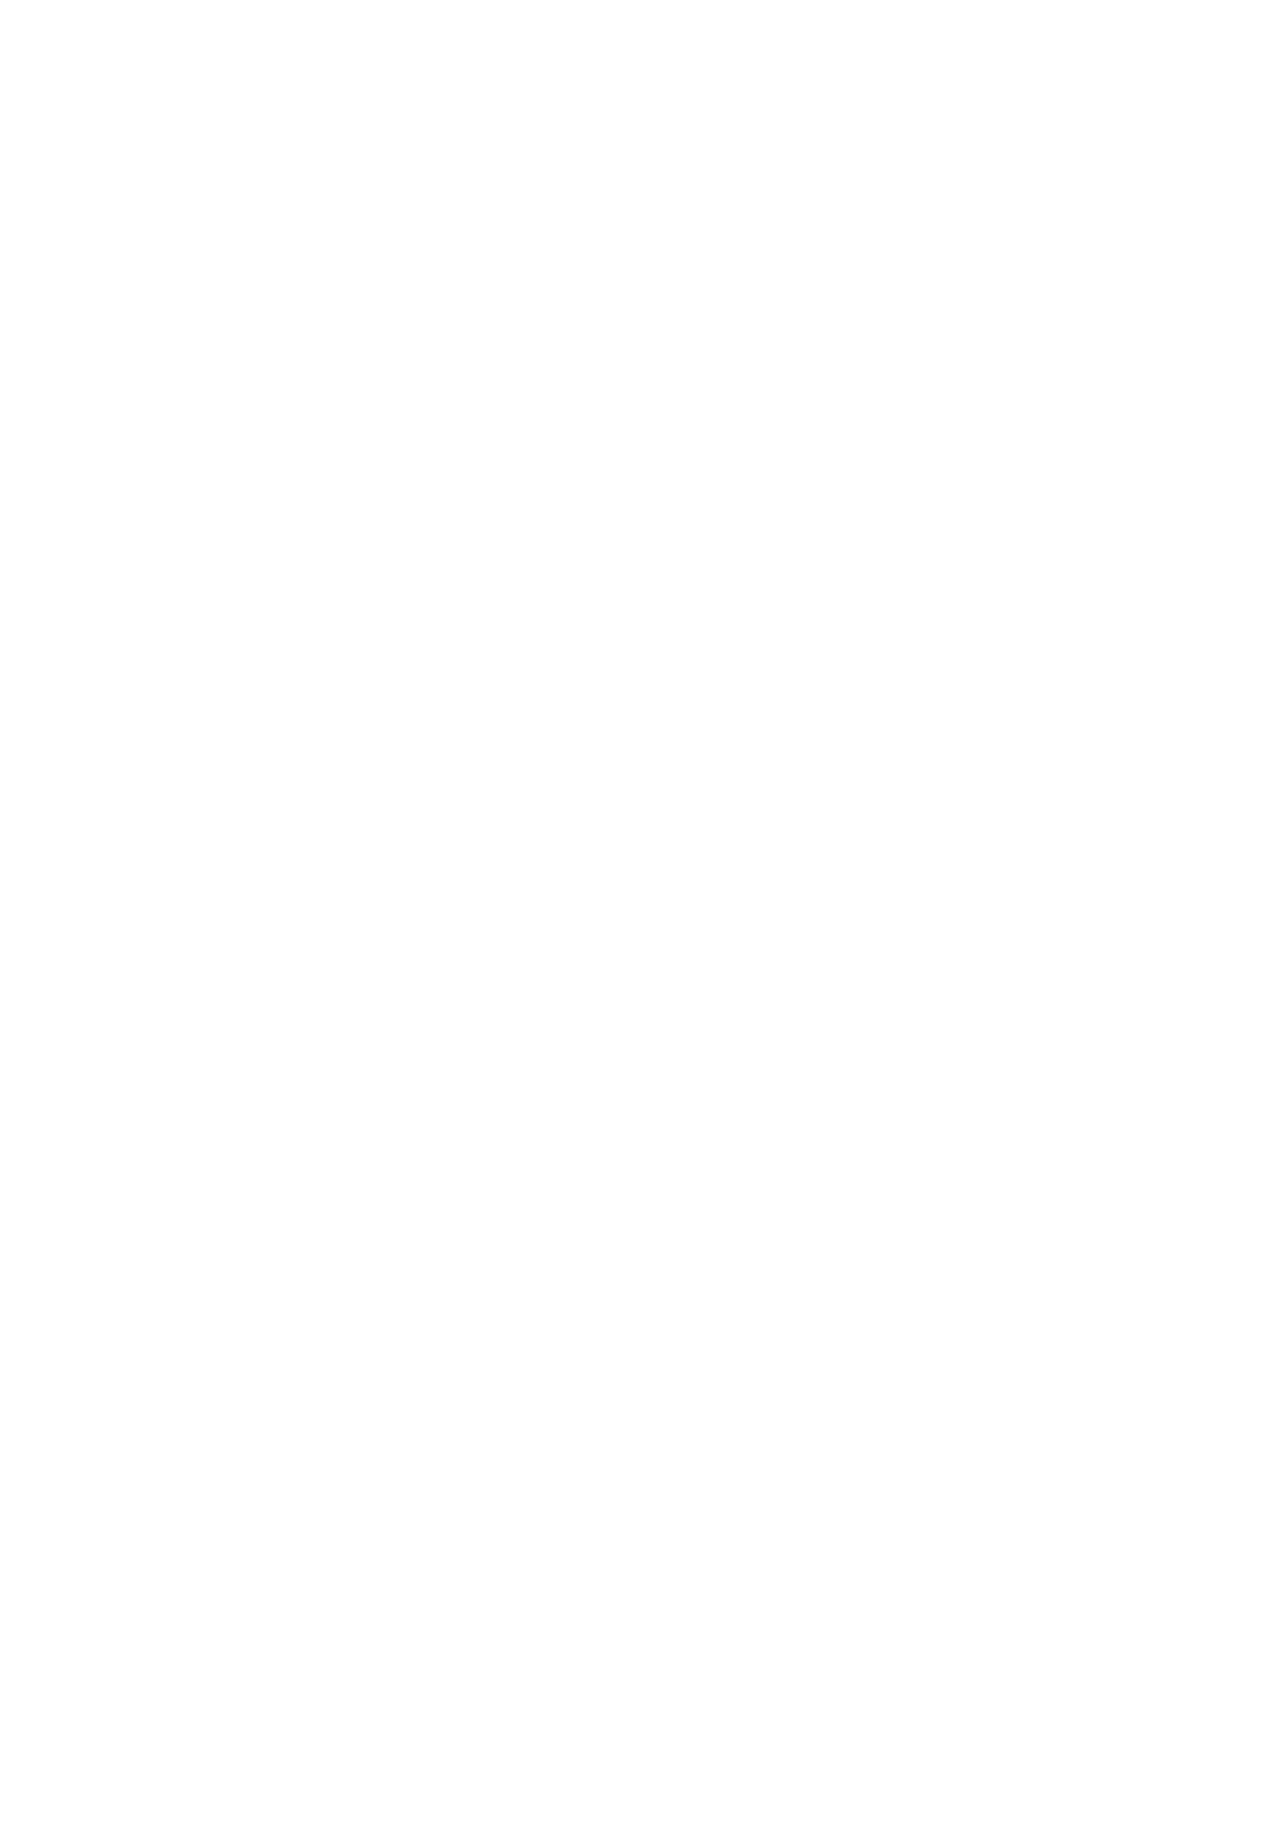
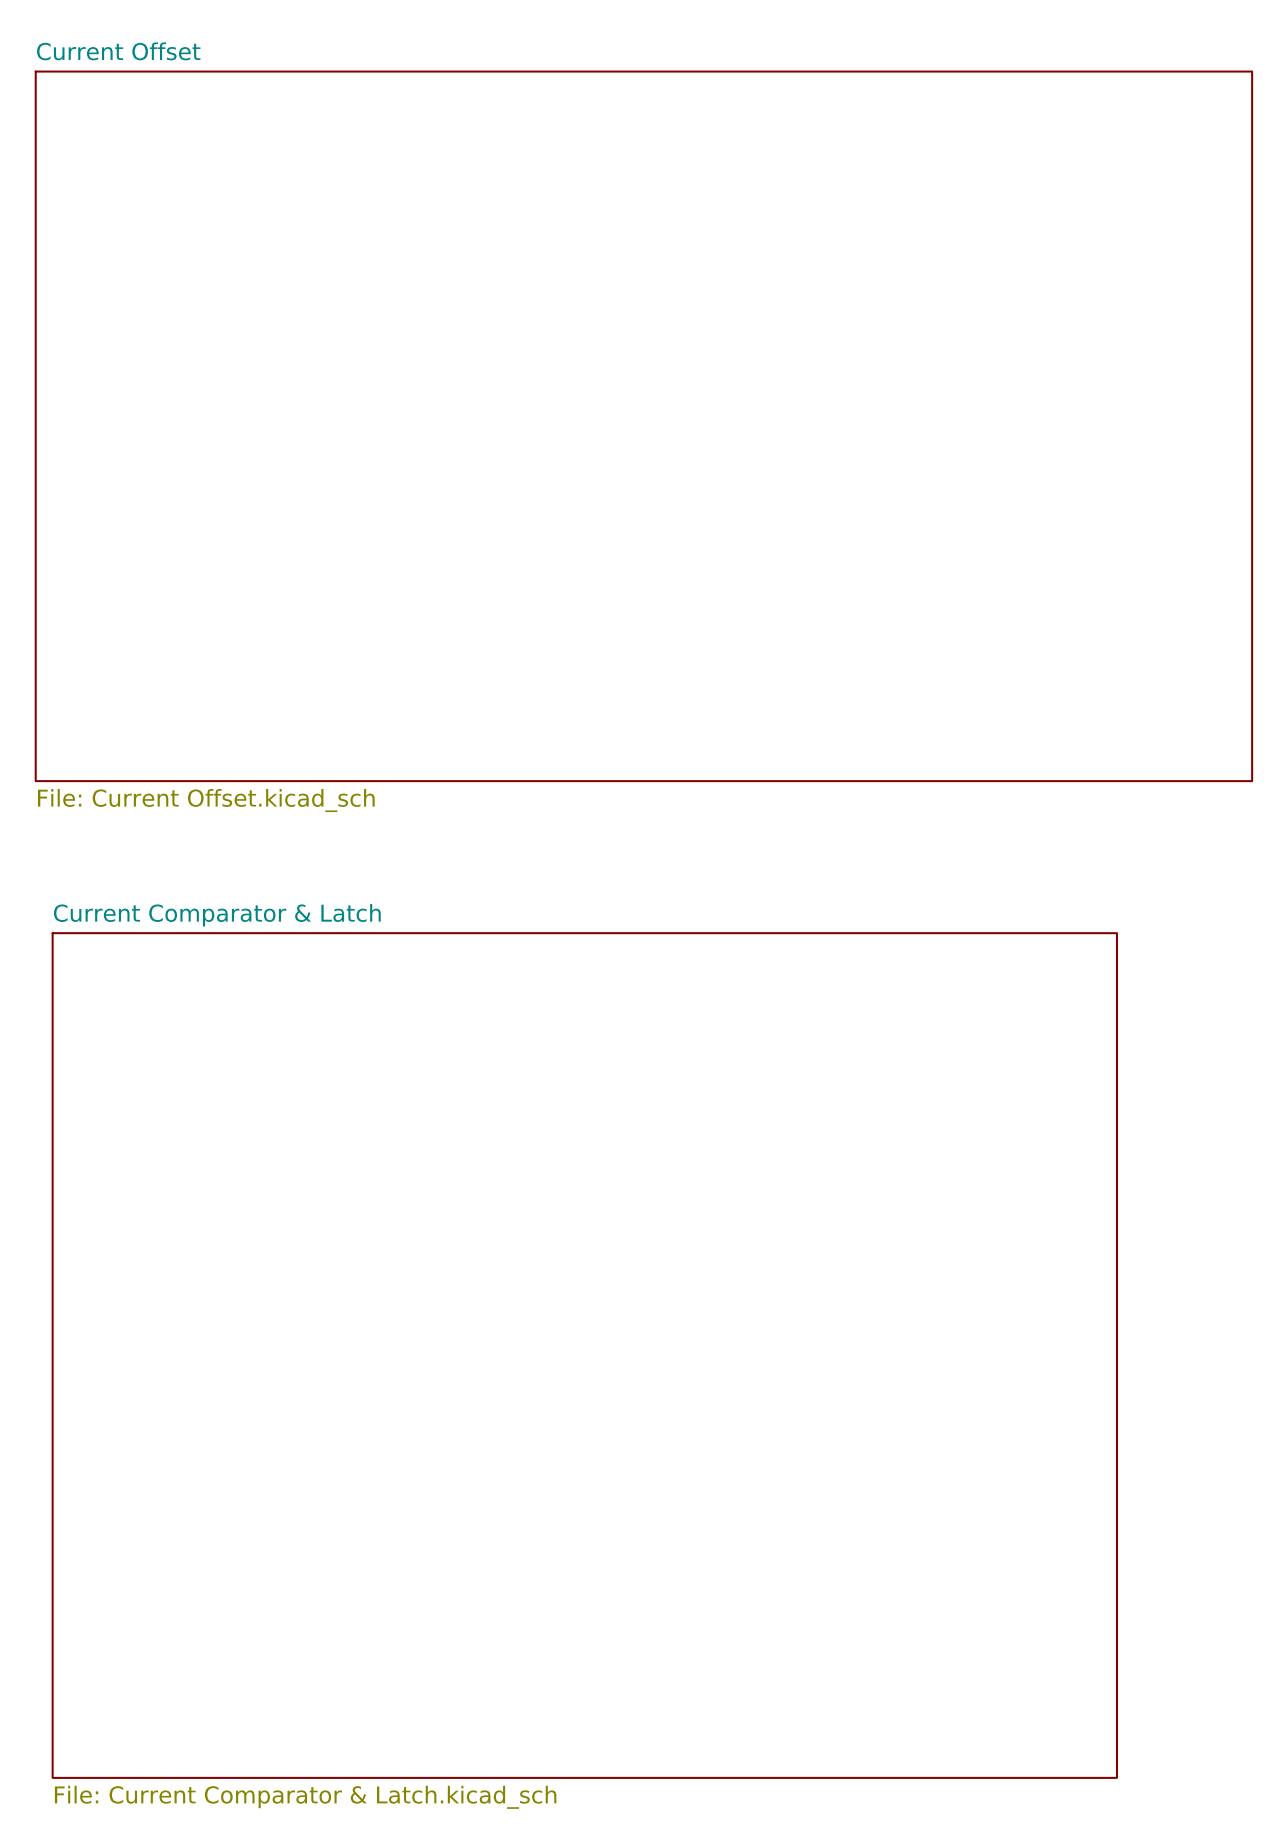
sheet Current Offset: none -> File: Current Offset.kicad_sch (643, 426)
sheet Current Comparator & Latch: none -> File: Current Comparator & Latch.kicad_sch (584, 1355)

